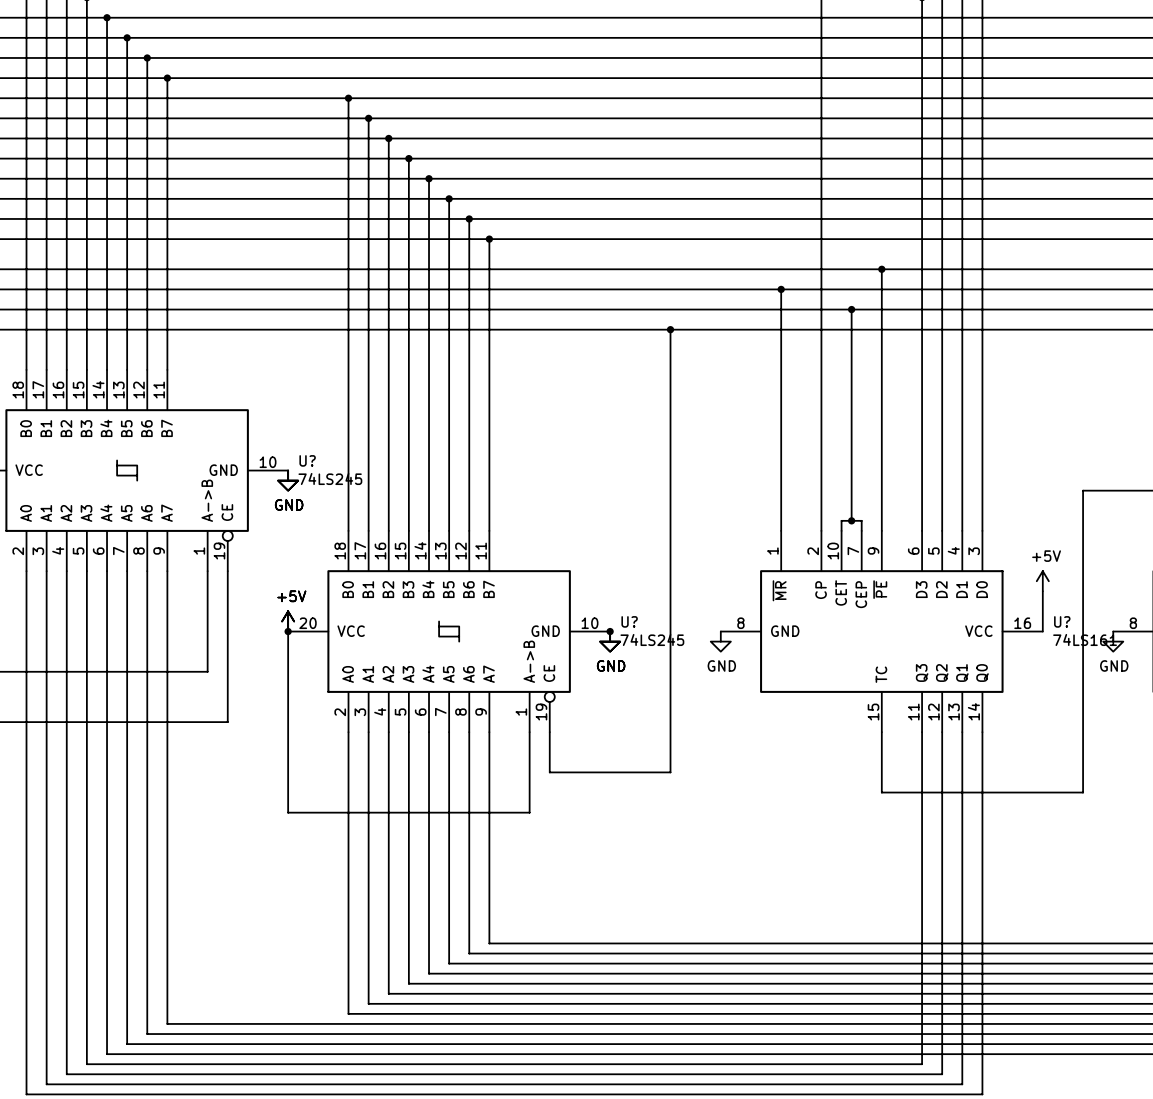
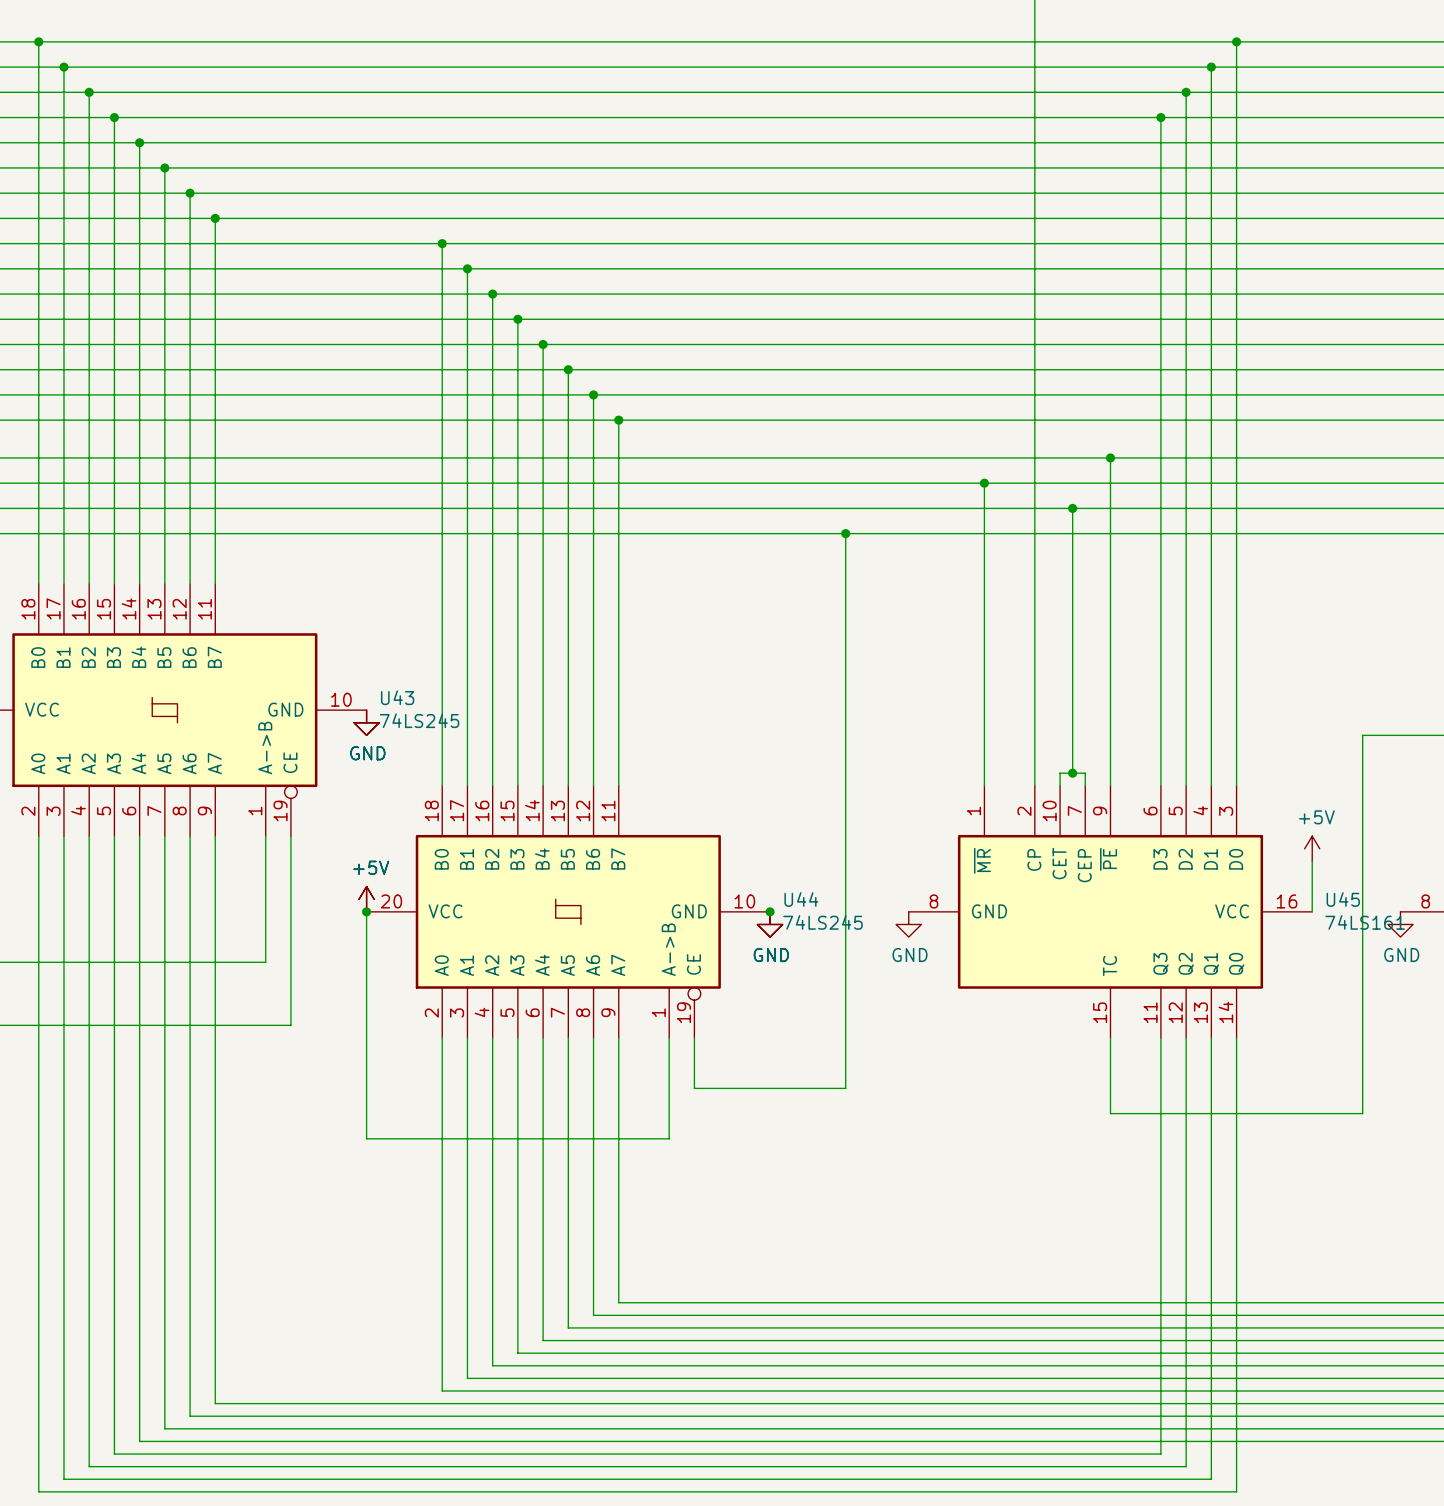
U? name: U? (307, 460) -> U43 (397, 697)
U? name: U? (629, 621) -> U44 (801, 899)
U? name: U? (1062, 621) -> U45 (1343, 899)

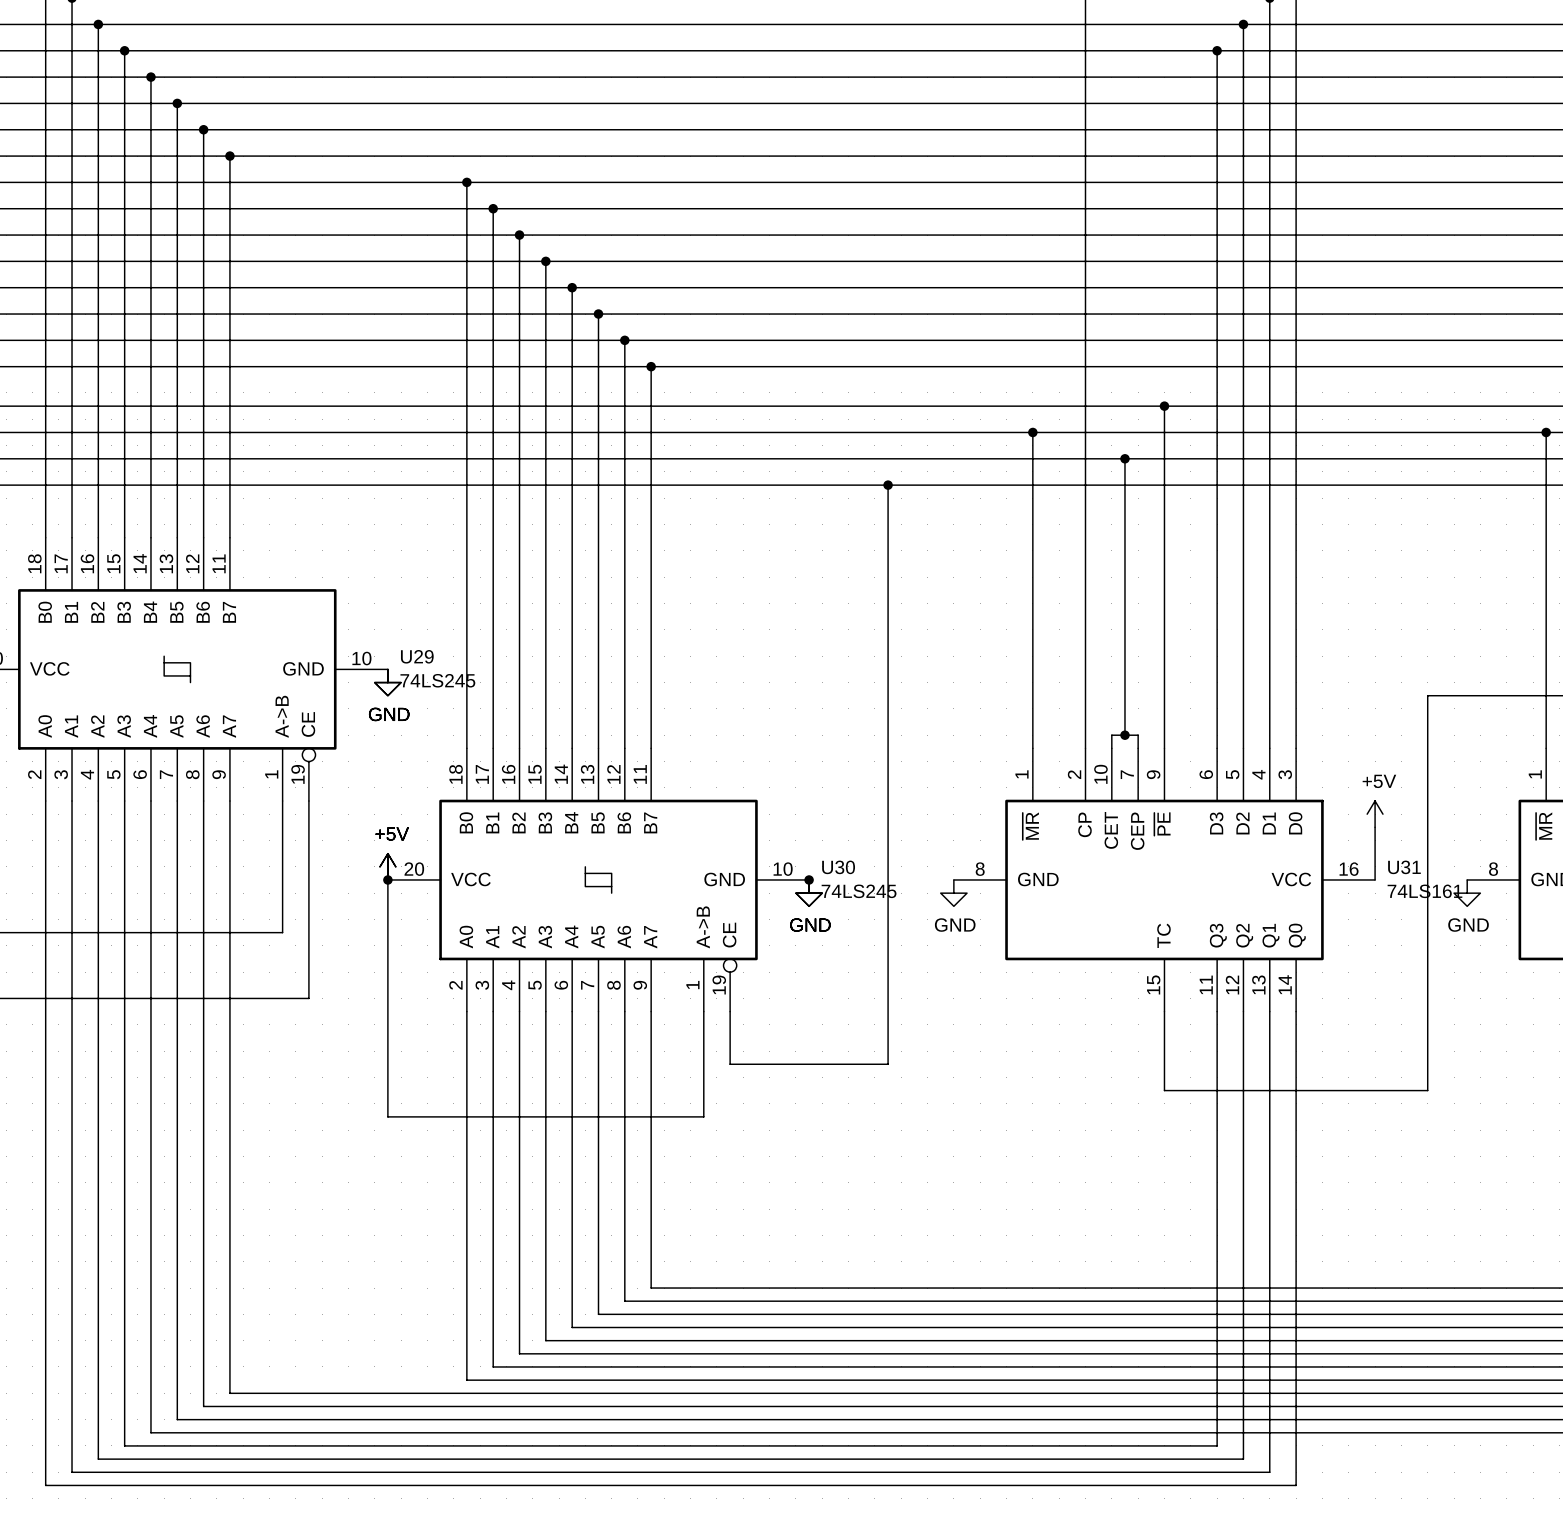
U43 name: U43 (397, 697) -> U29 (417, 656)
U44 name: U44 (801, 899) -> U30 (838, 867)
U45 name: U45 (1343, 899) -> U31 (1404, 867)

